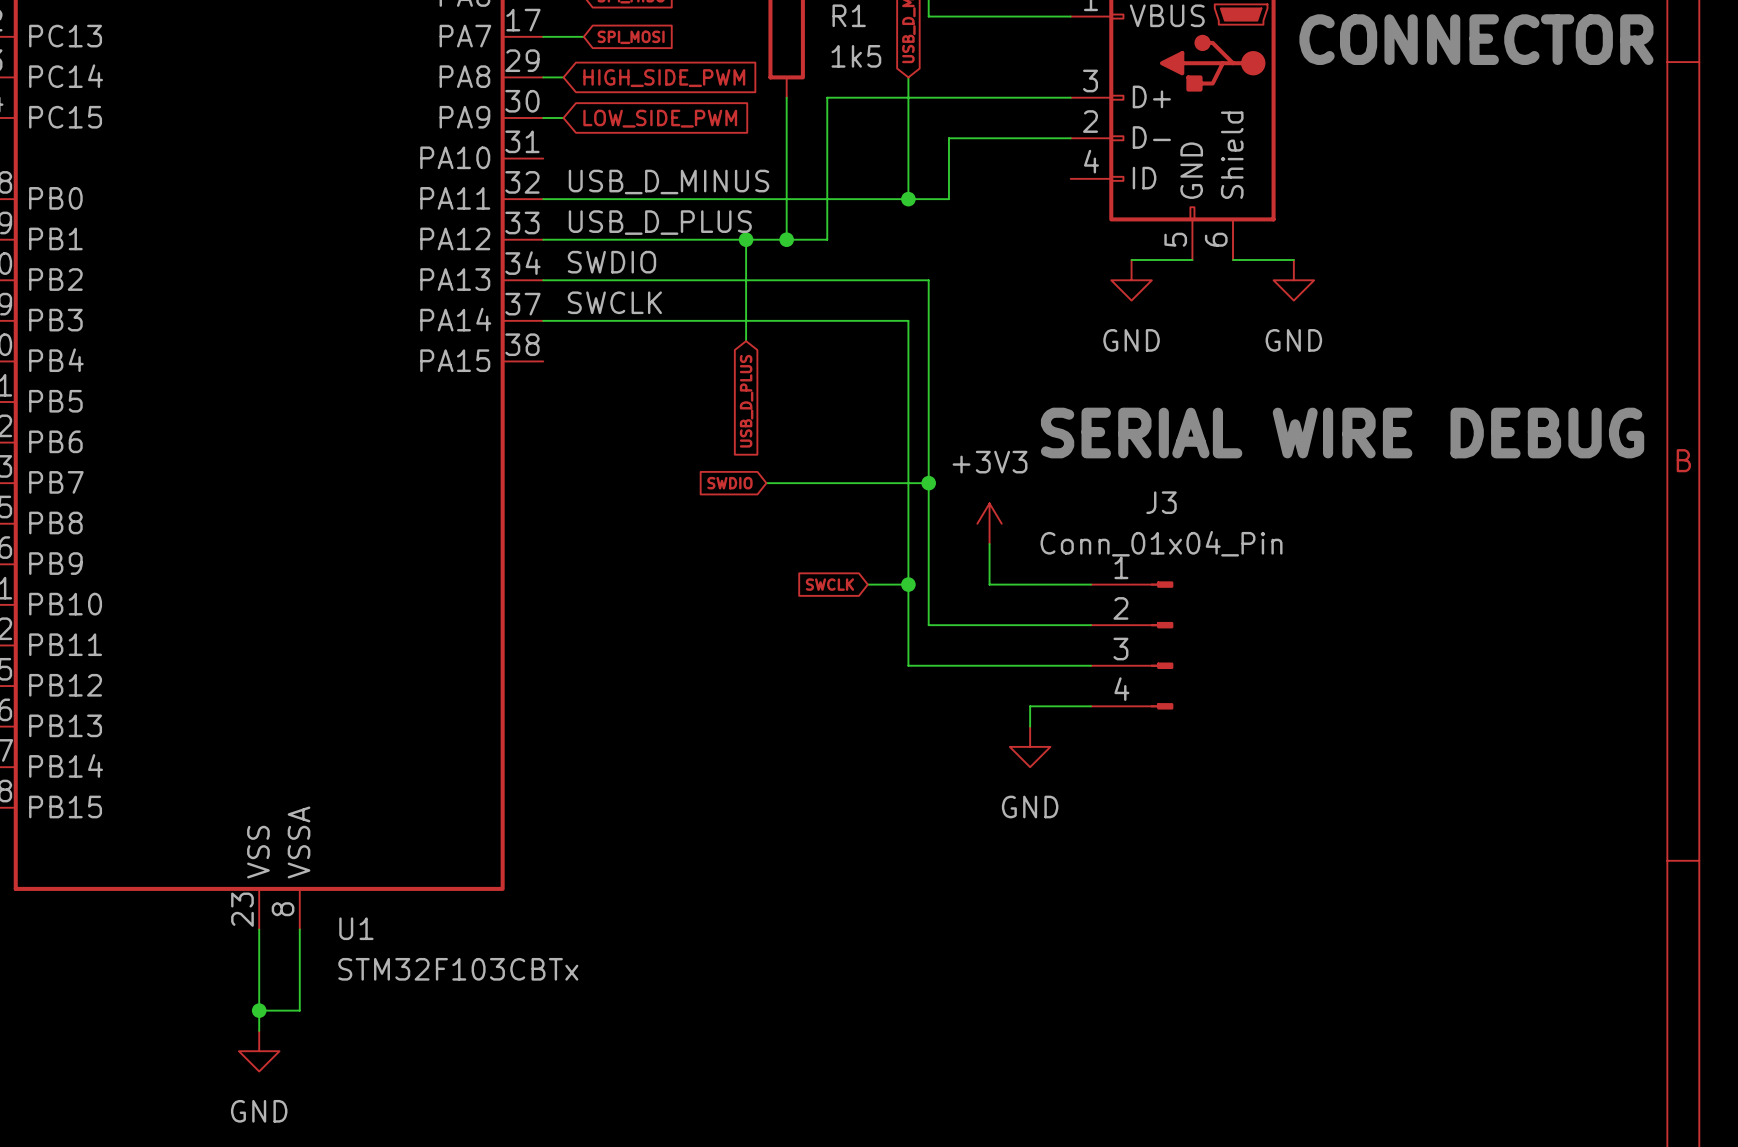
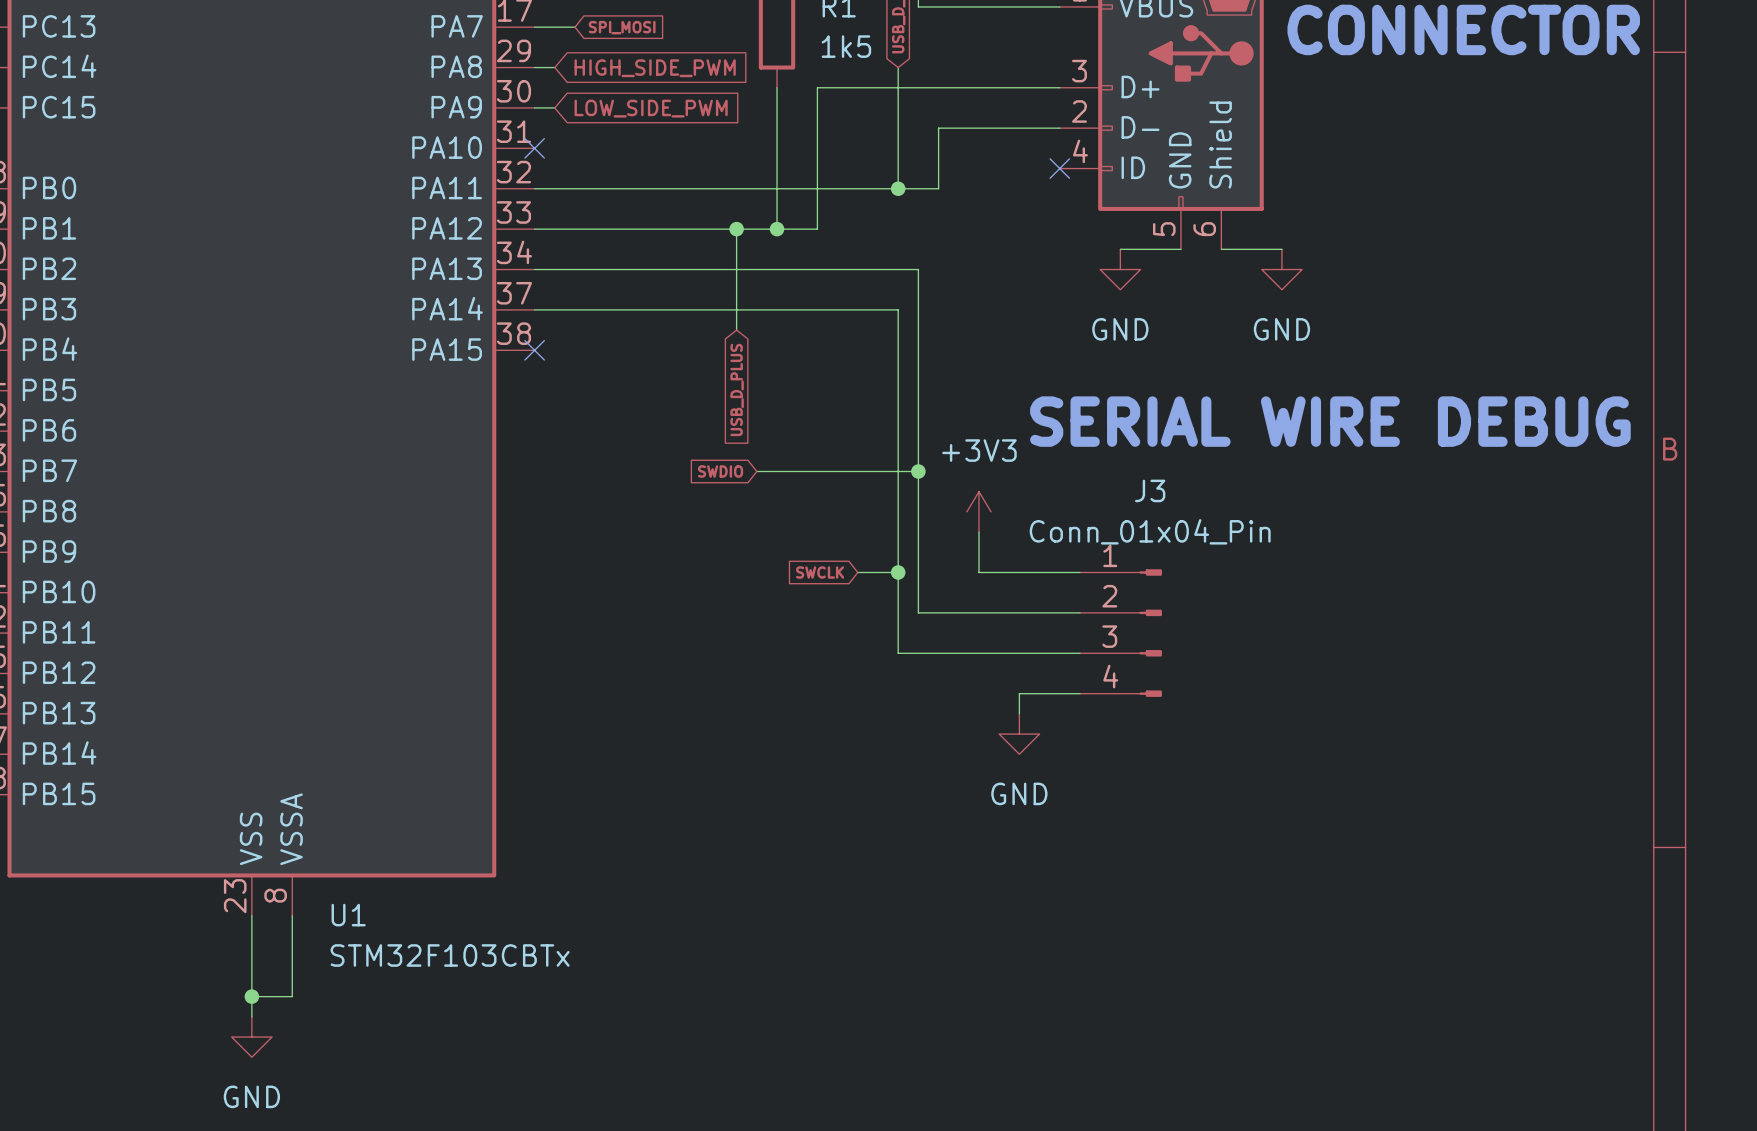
no-connect mark: none -> (534, 148)
no-connect mark: none -> (1059, 168)
label: USB_D_MINUS (668, 182) -> none
label: USB_D_PLUS (660, 222) -> none
label: SWDIO (611, 262) -> none
label: SWCLK (614, 302) -> none
no-connect mark: none -> (534, 350)

